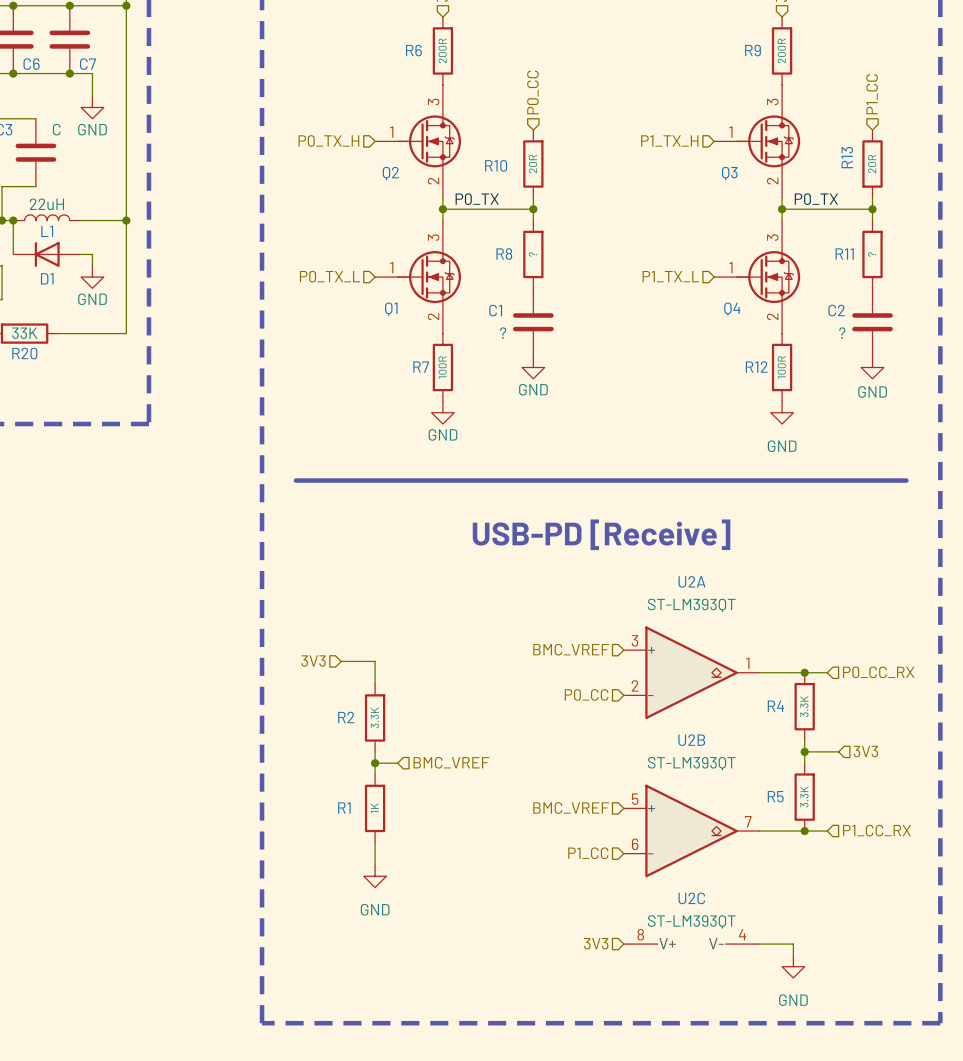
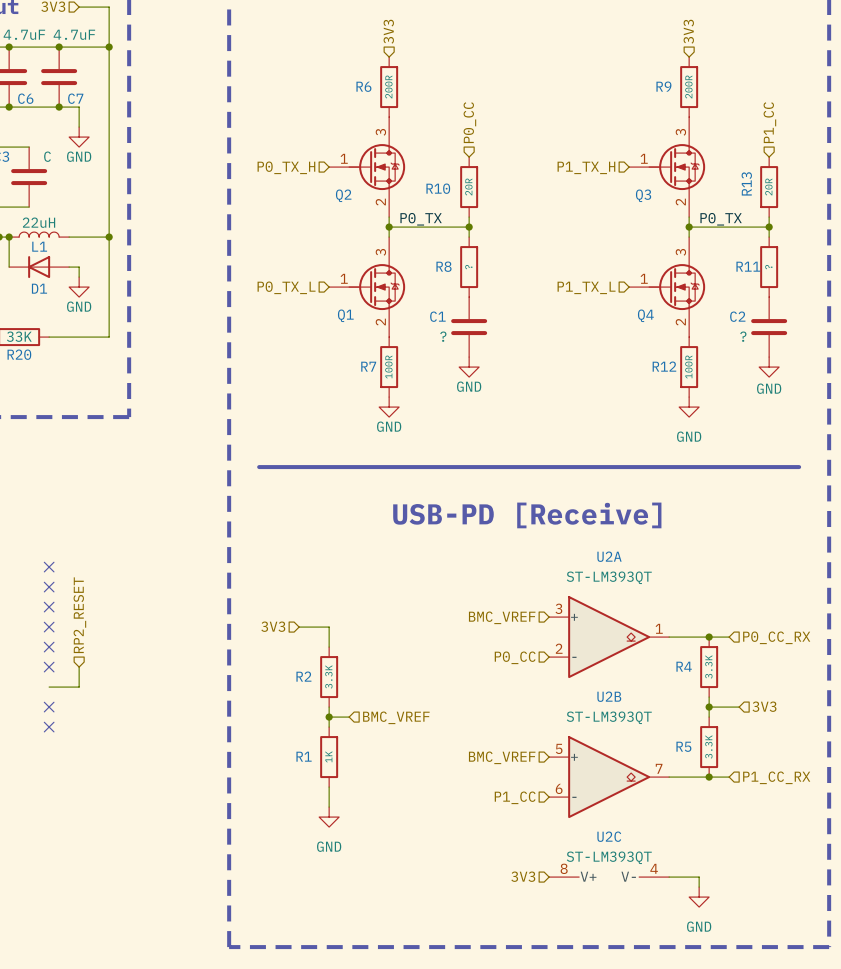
no-connect mark: none -> (49, 567)
no-connect mark: none -> (49, 587)
no-connect mark: none -> (49, 607)
hierarchical label: none -> RP2_RESET (79, 615)
no-connect mark: none -> (49, 627)
no-connect mark: none -> (49, 647)
no-connect mark: none -> (49, 667)
wire: none -> (79, 667) (79, 687) (49, 687)
no-connect mark: none -> (49, 707)
no-connect mark: none -> (49, 727)

